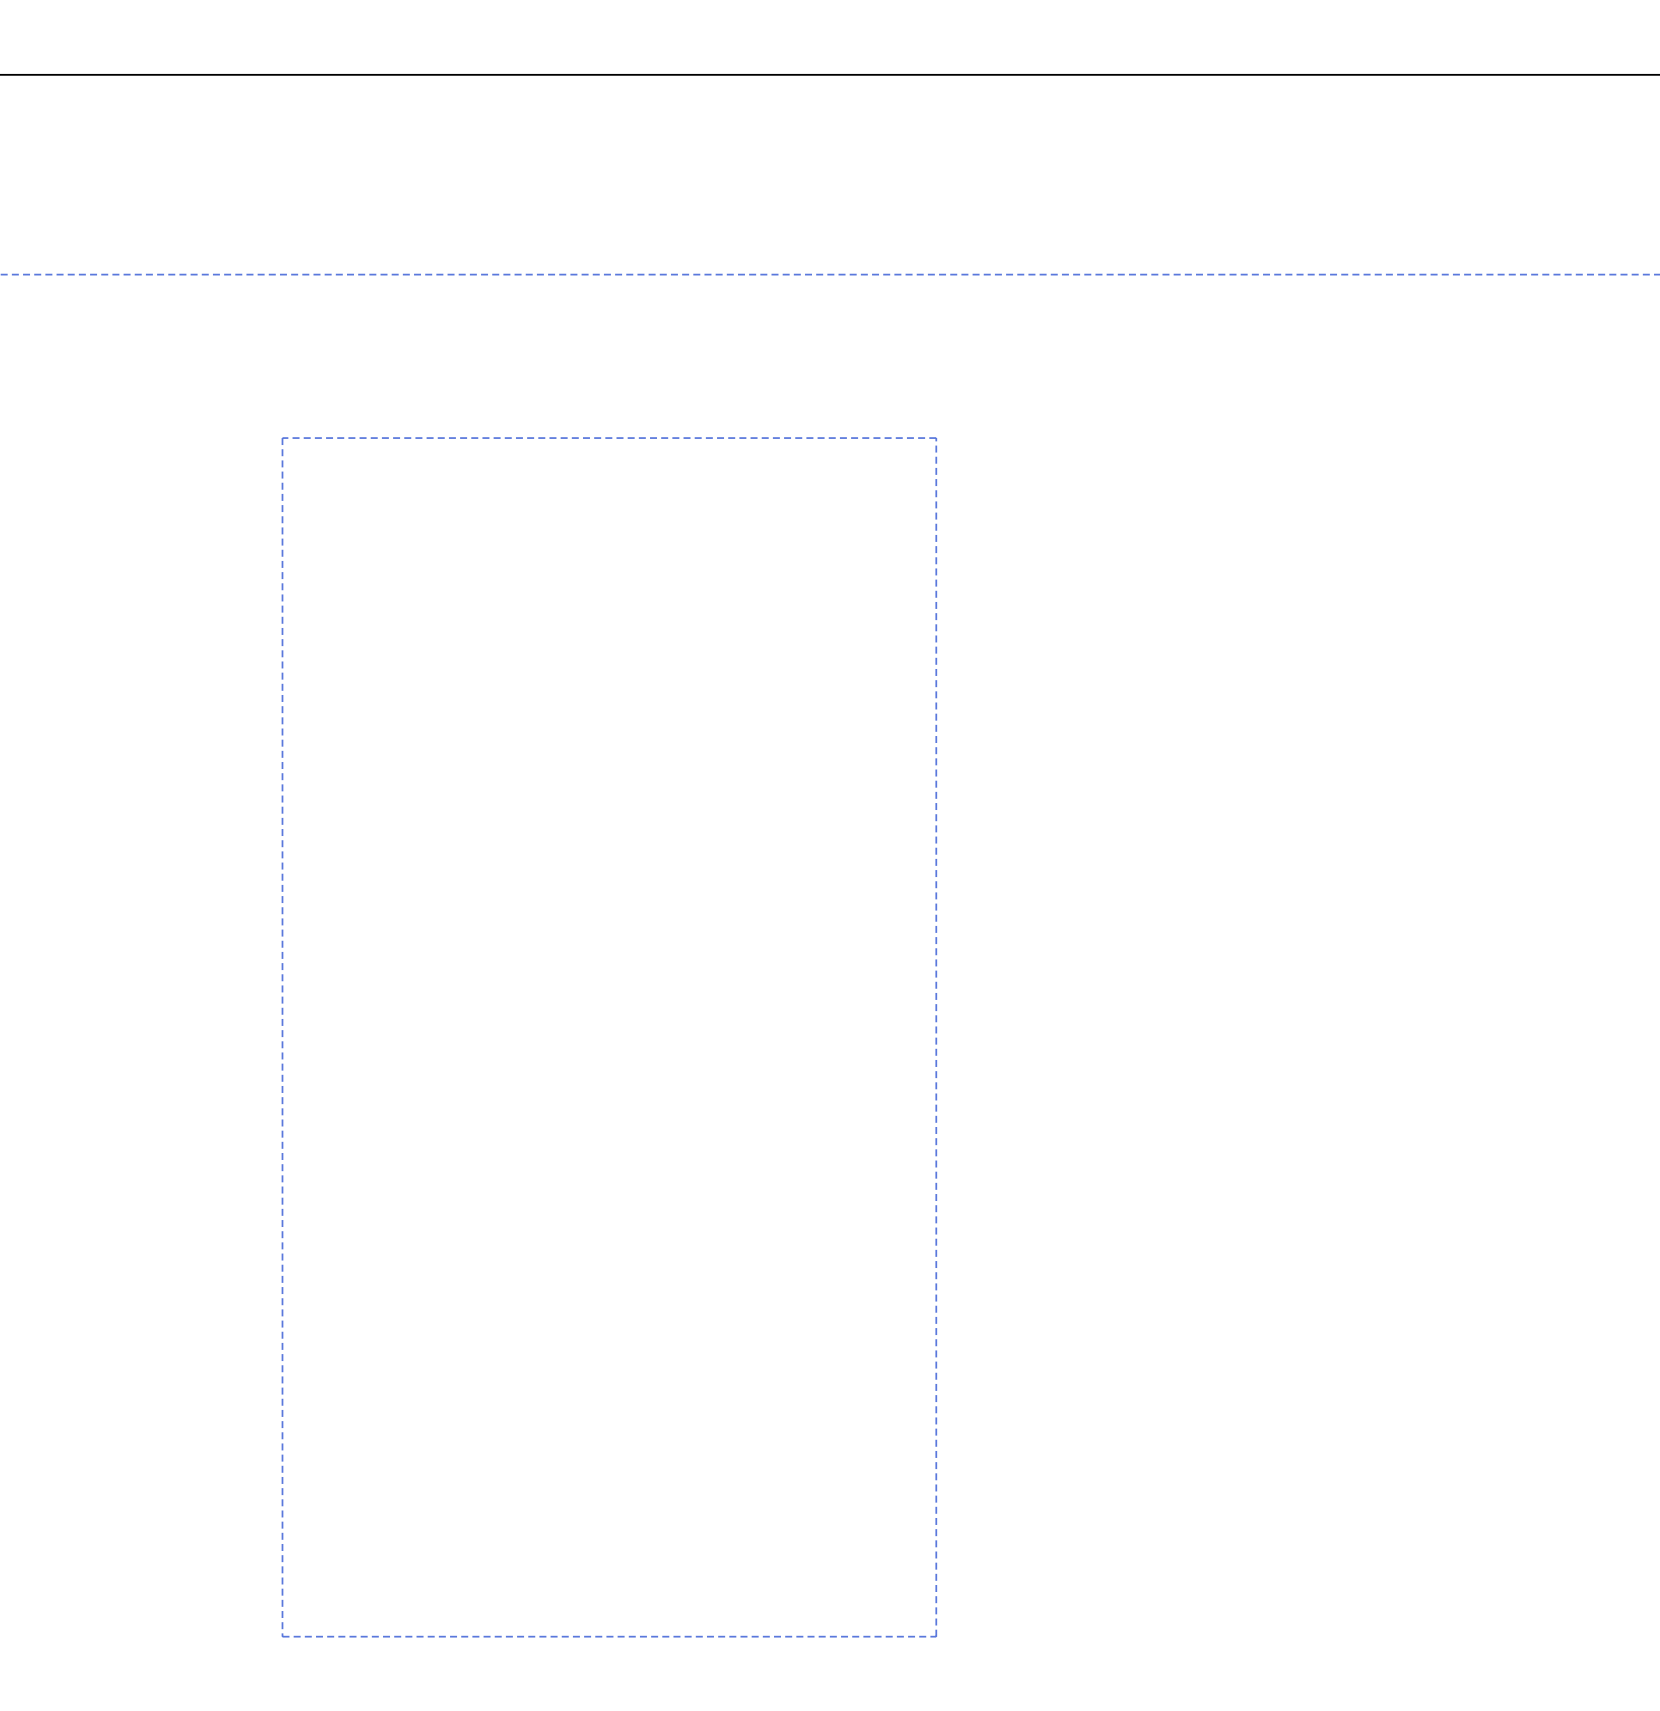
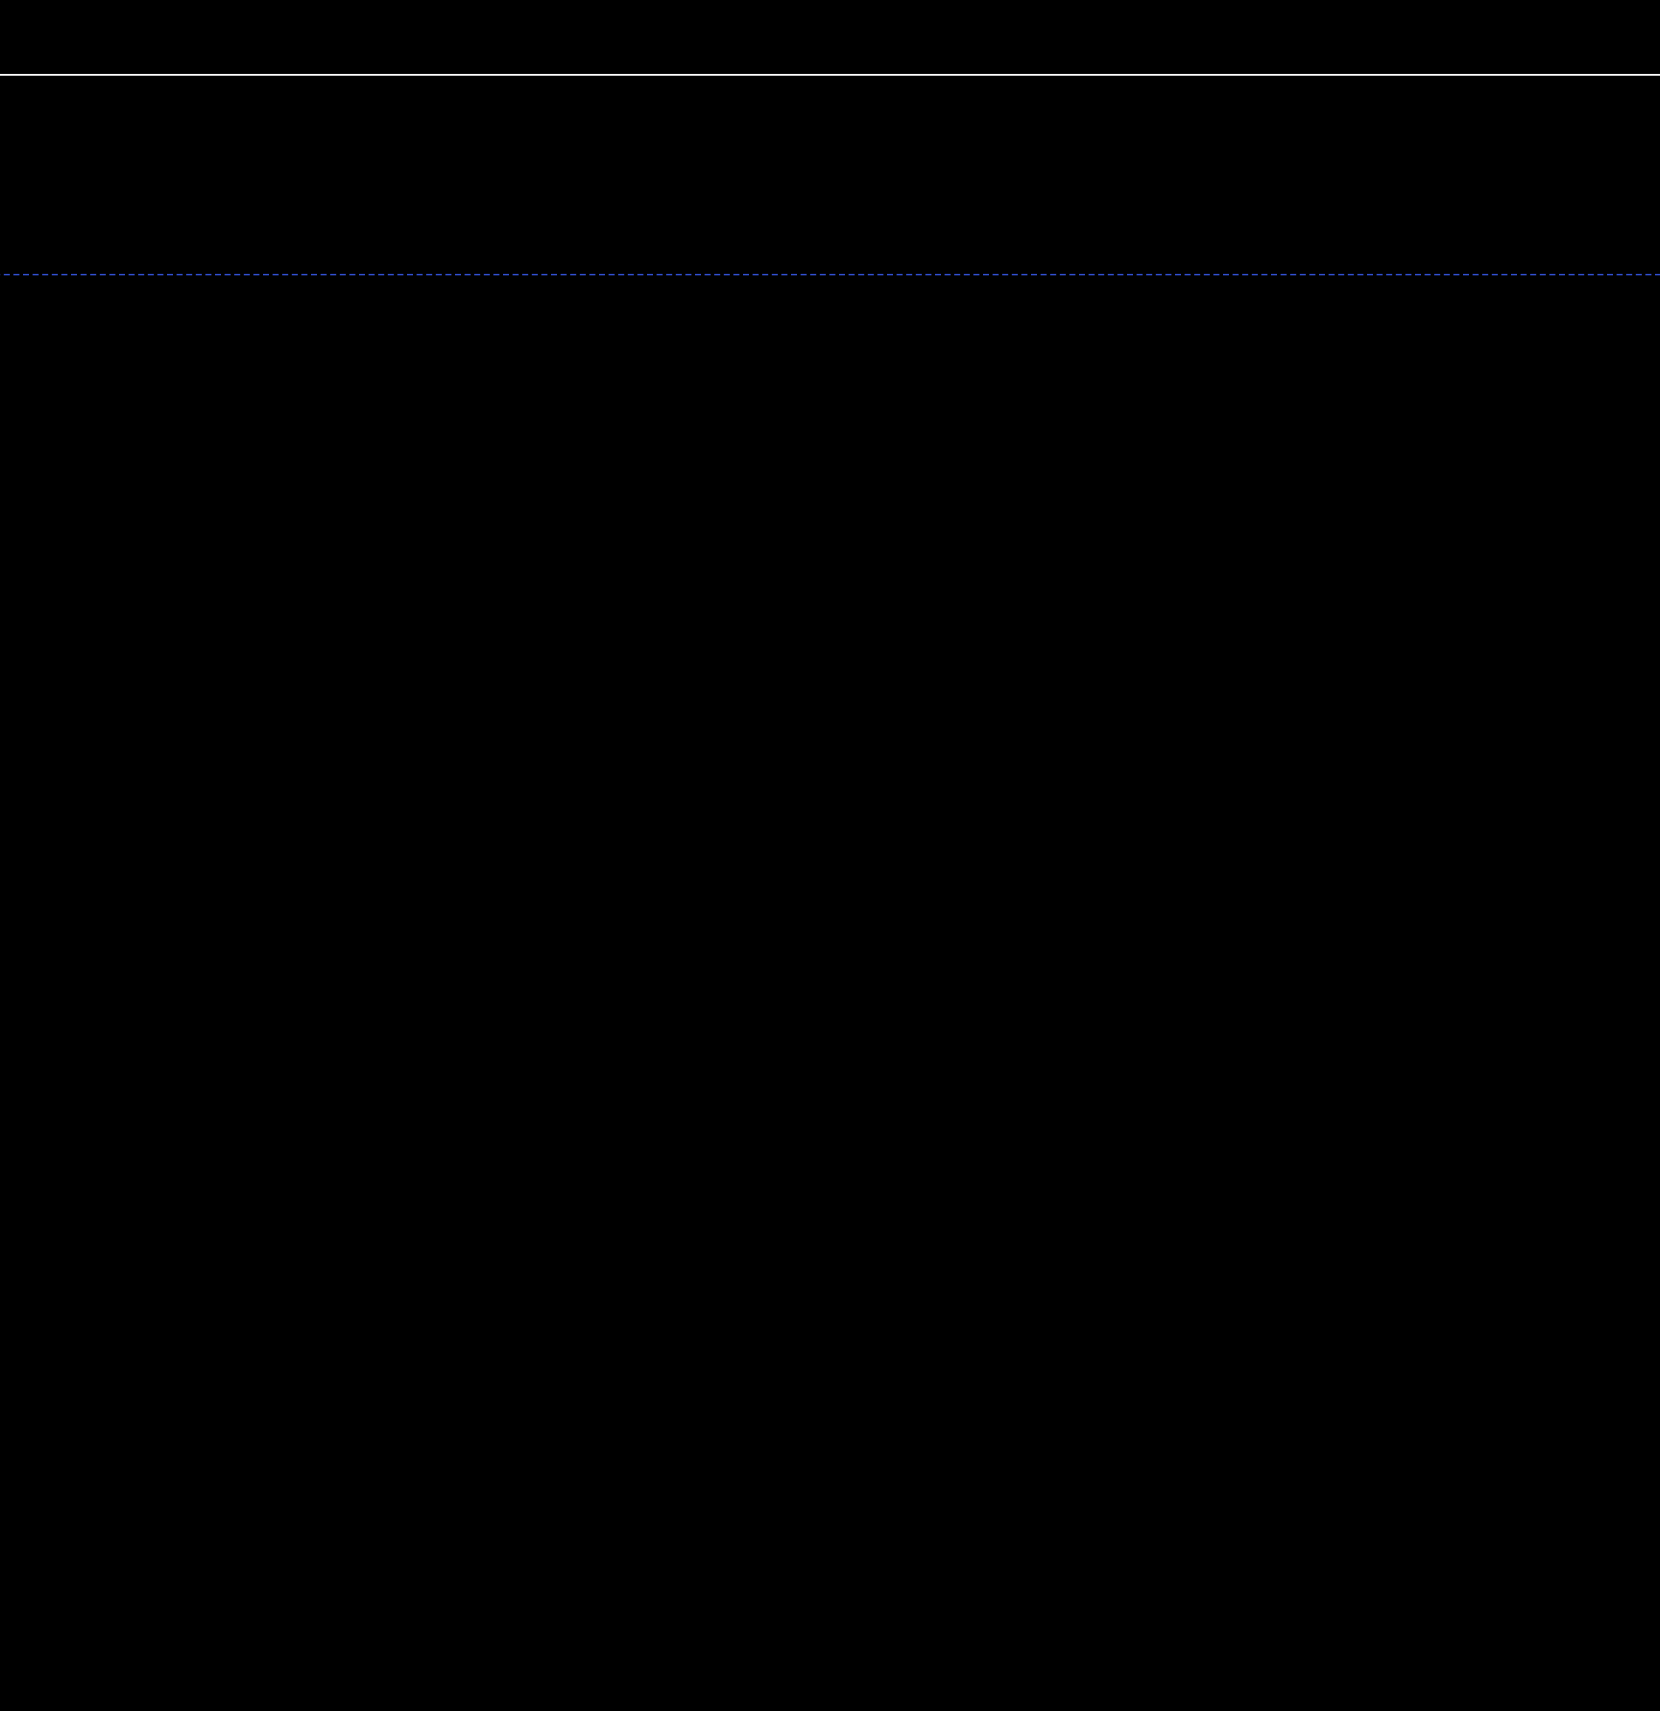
bottom zone outline: (936, 438) (936, 1636) (282, 1636) (282, 438) (936, 438) -> none

